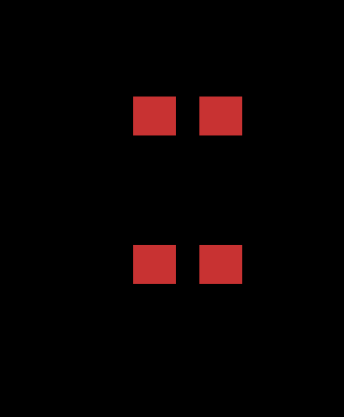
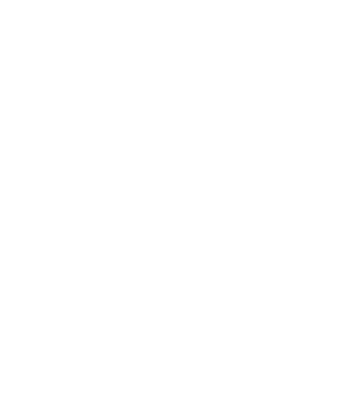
part: (187, 115) -> none
part: (187, 264) -> none

